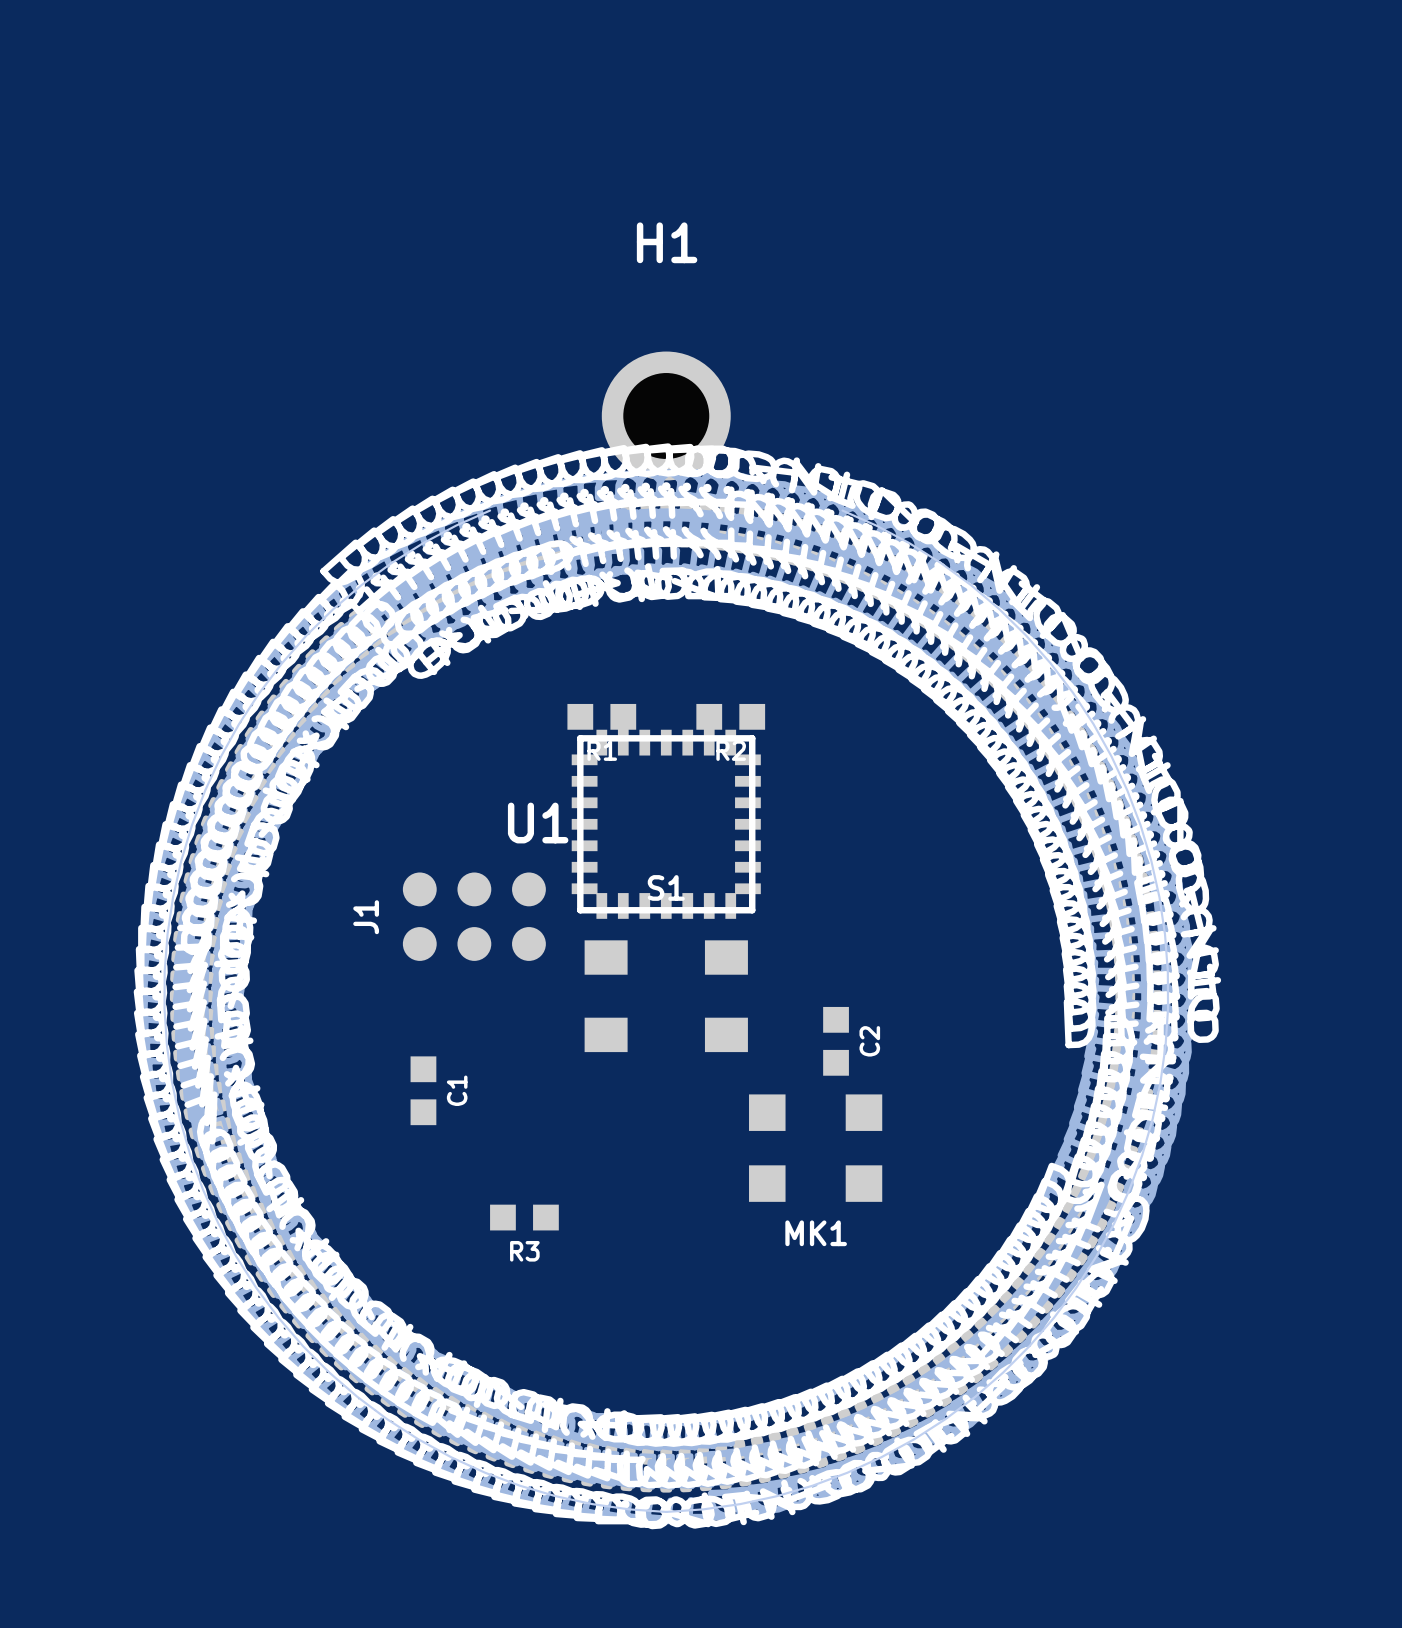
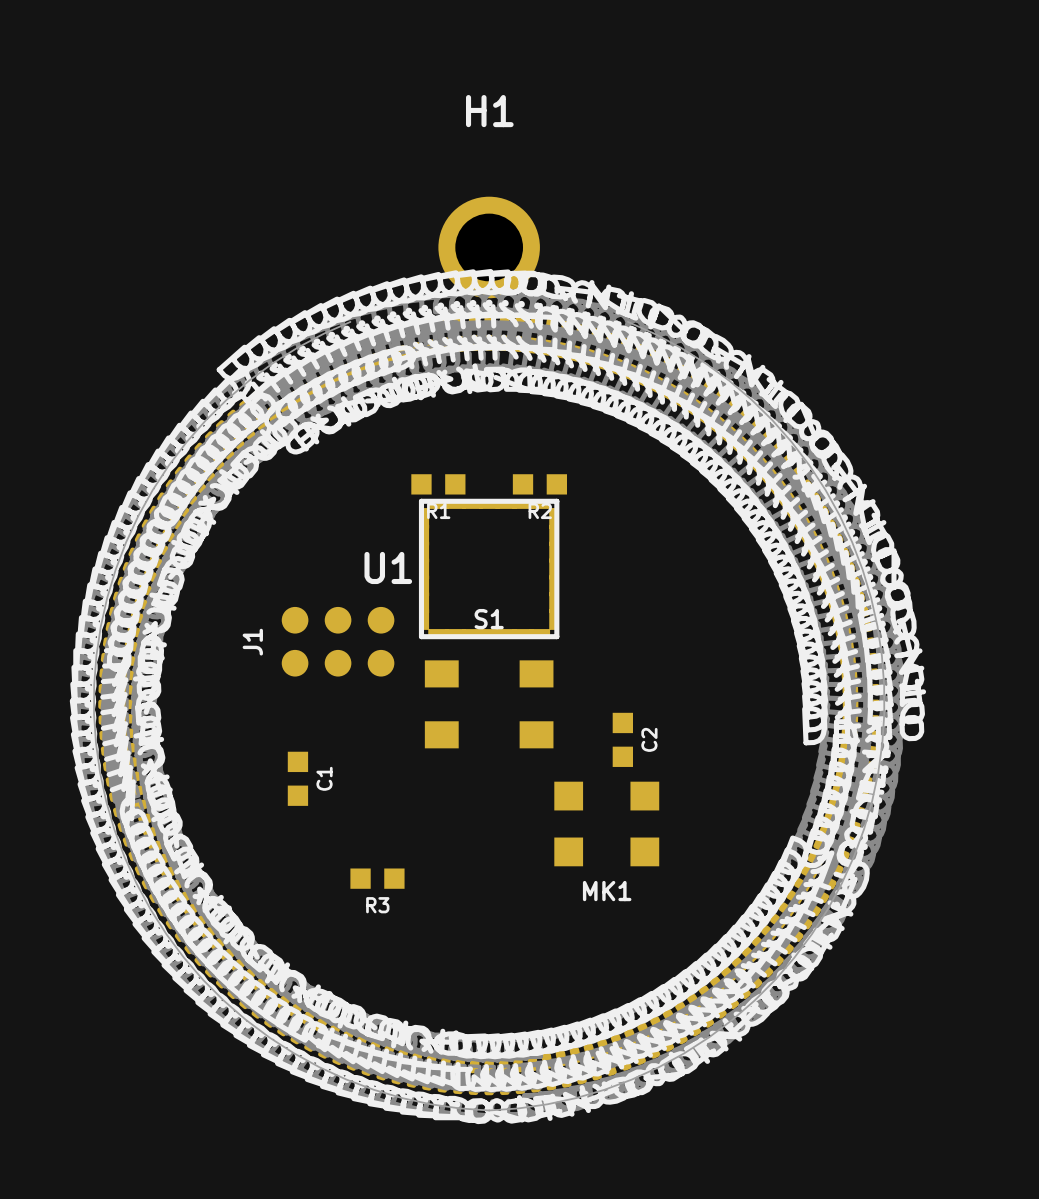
U1 footprint: [571, 729, 761, 919] -> [418, 498, 560, 640]

